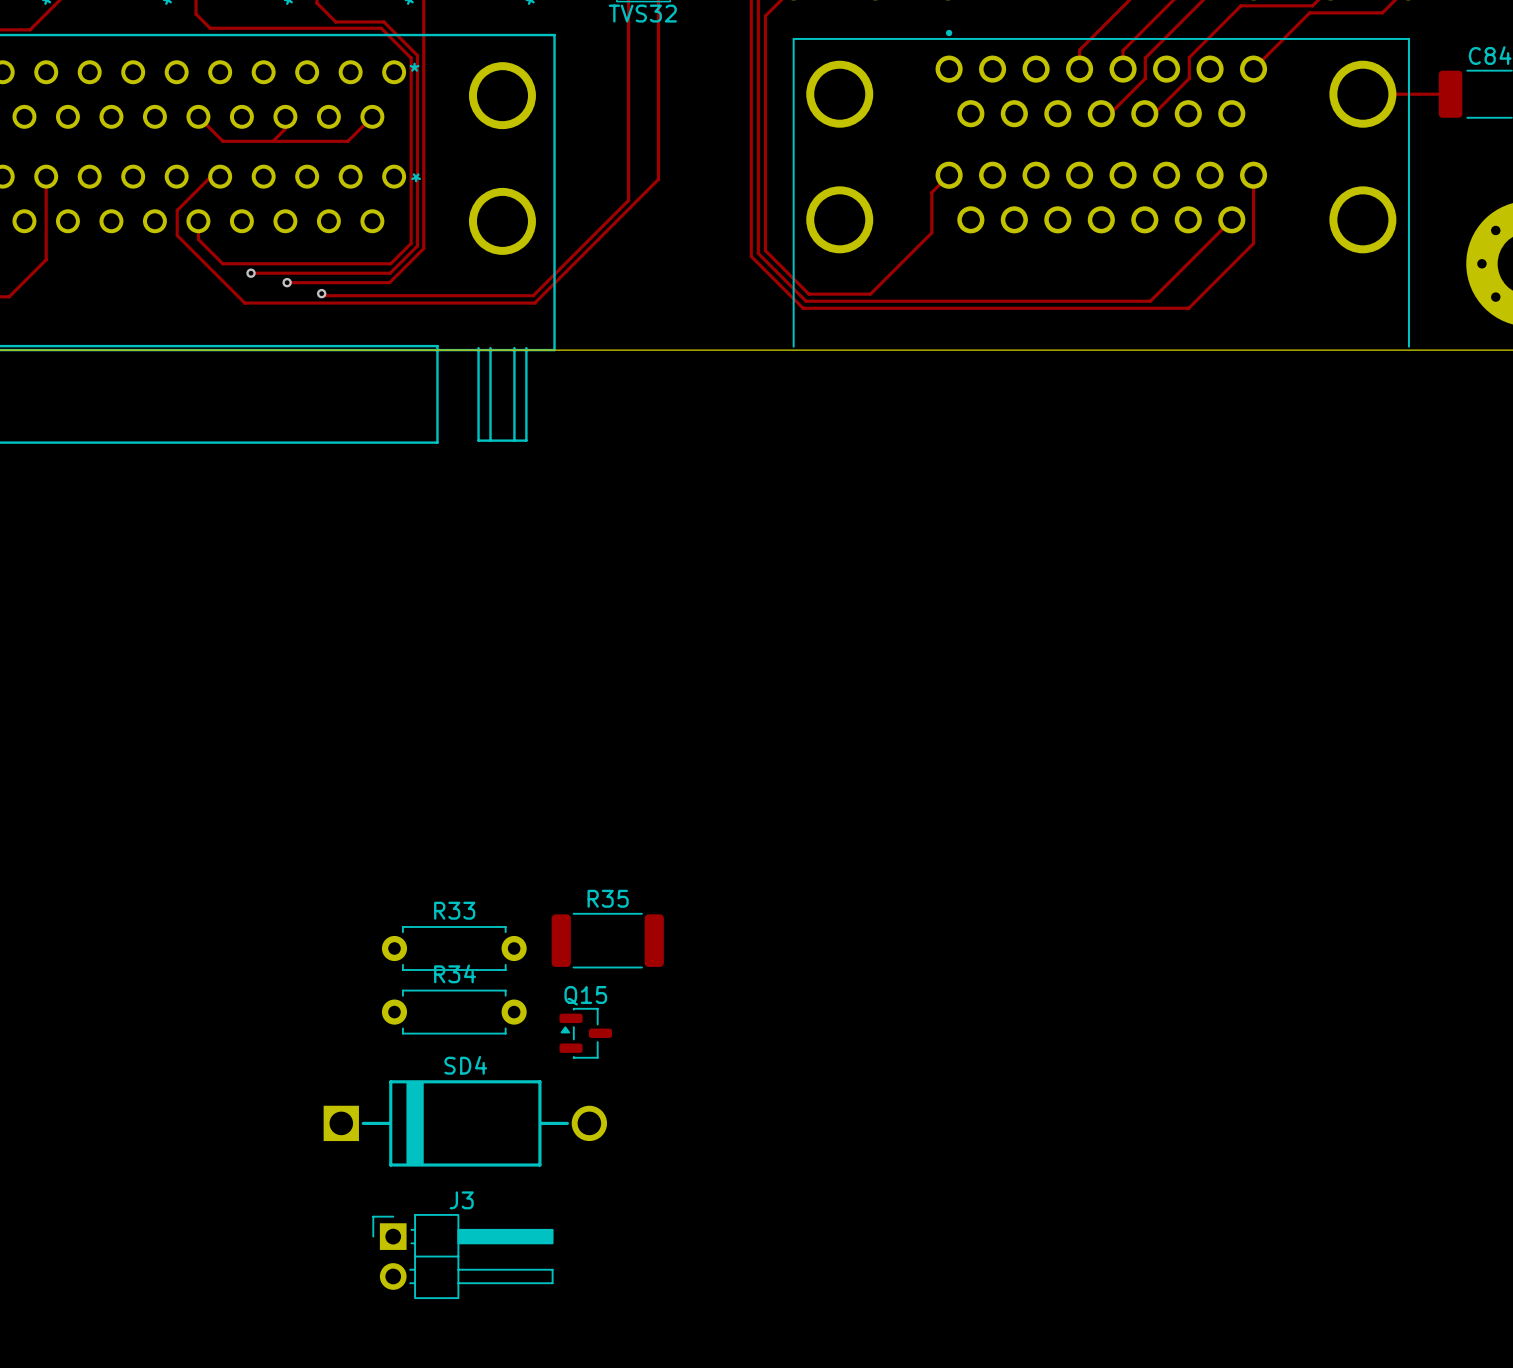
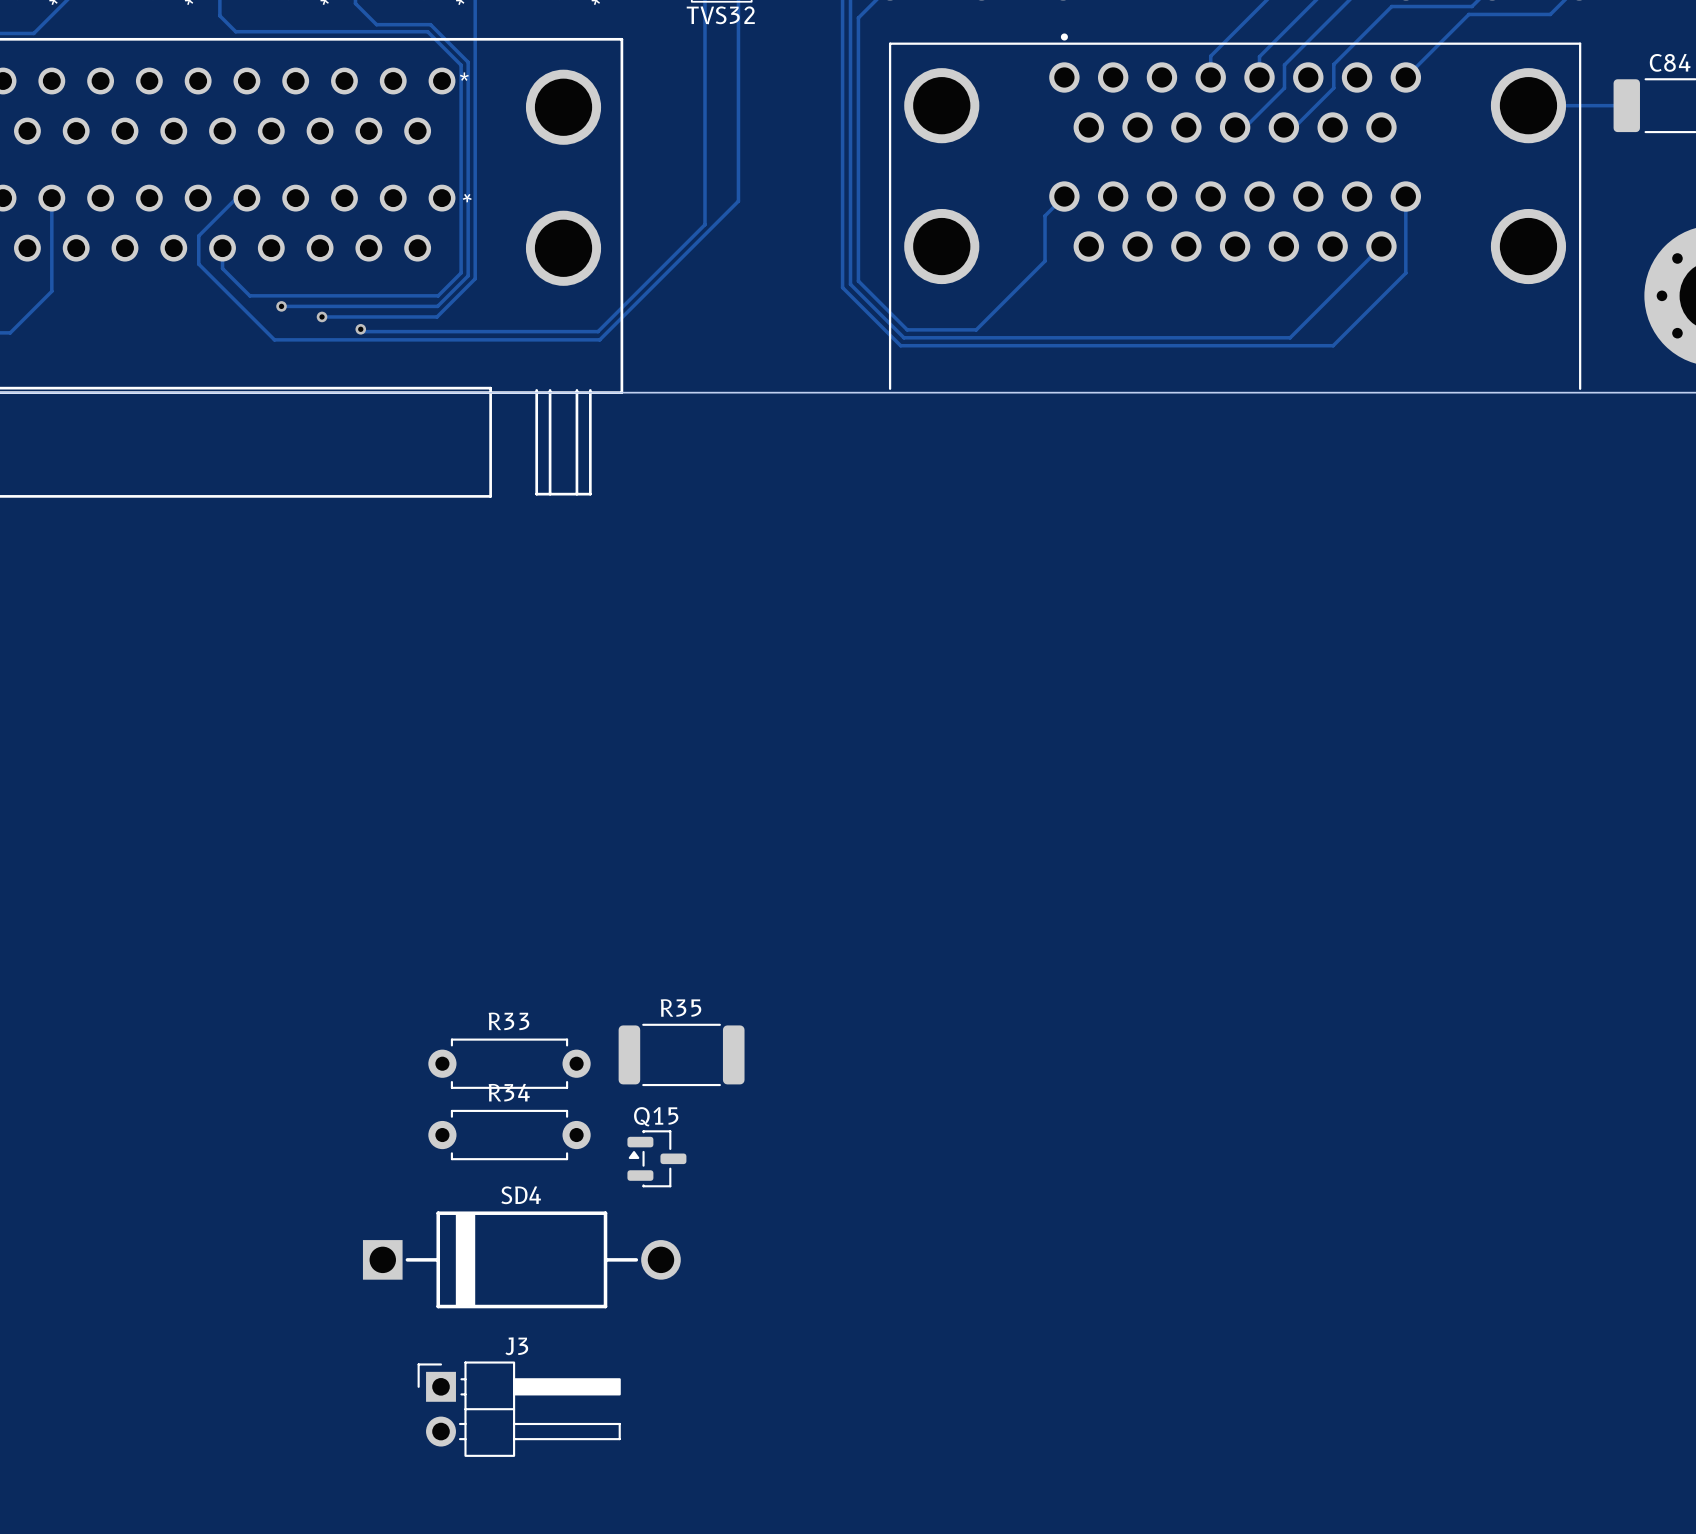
track: (198, 116) (222, 141) (347, 141) (372, 116) -> none
track: (285, 116) (285, 128) (273, 141) -> none

